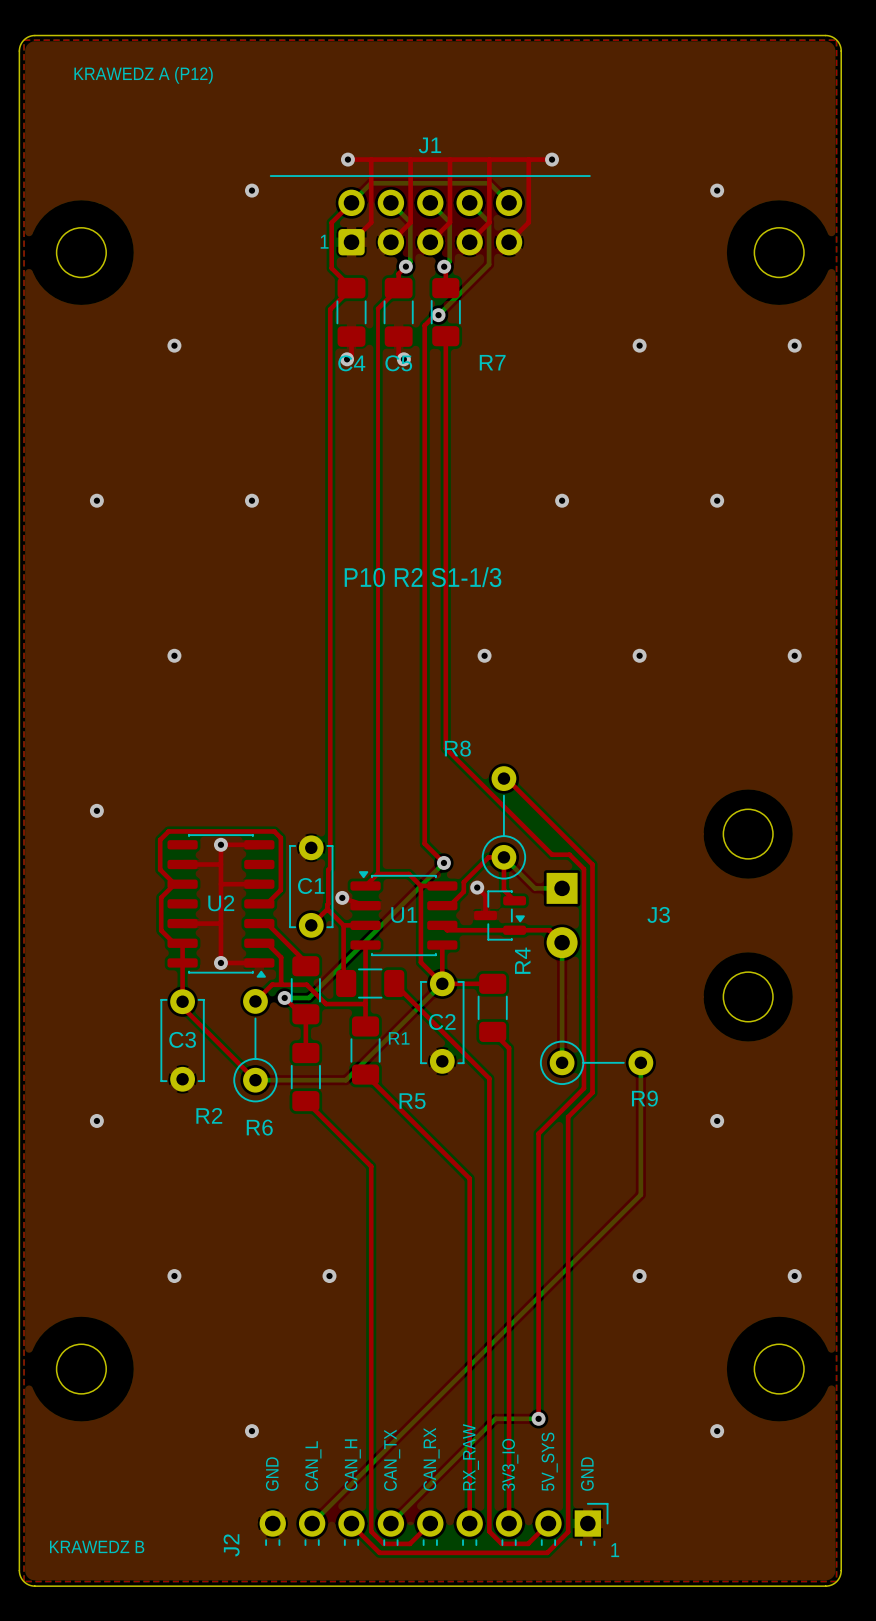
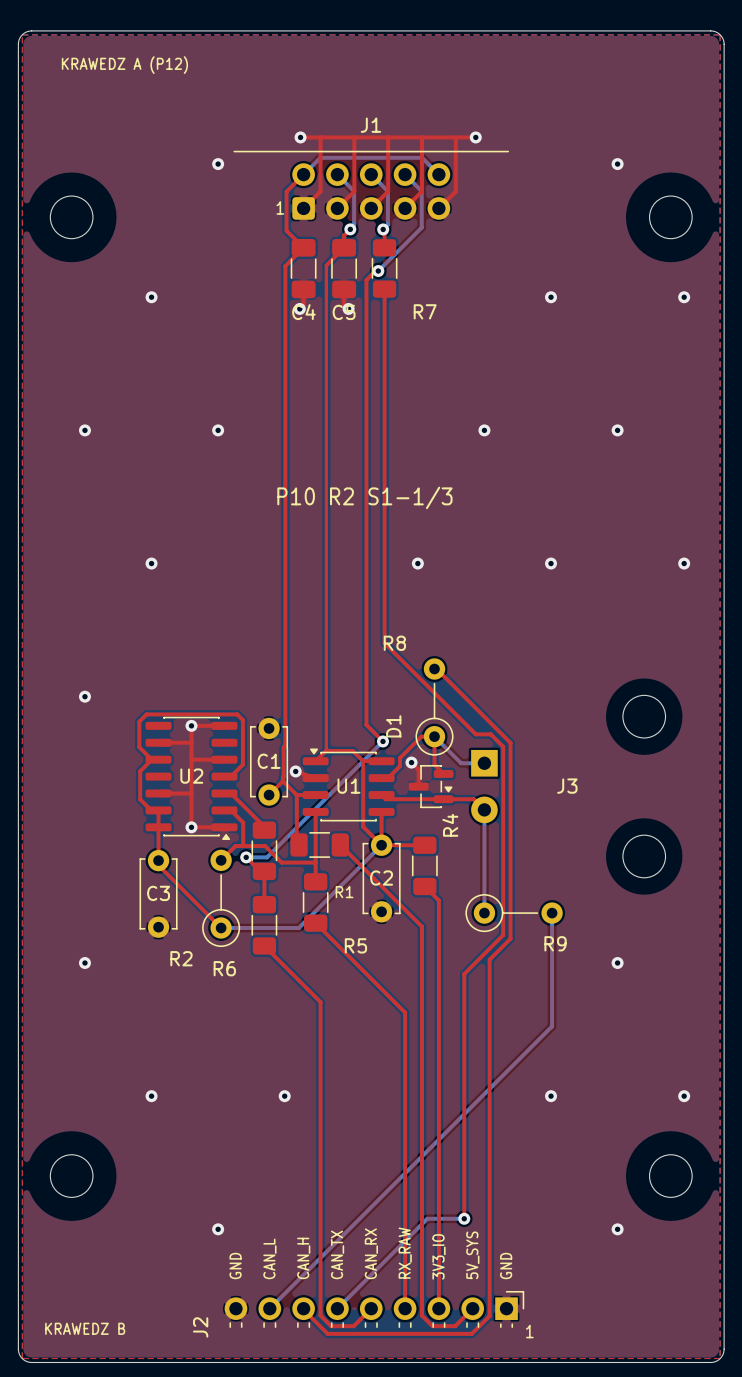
D1 name: none -> D1 (393, 726)

